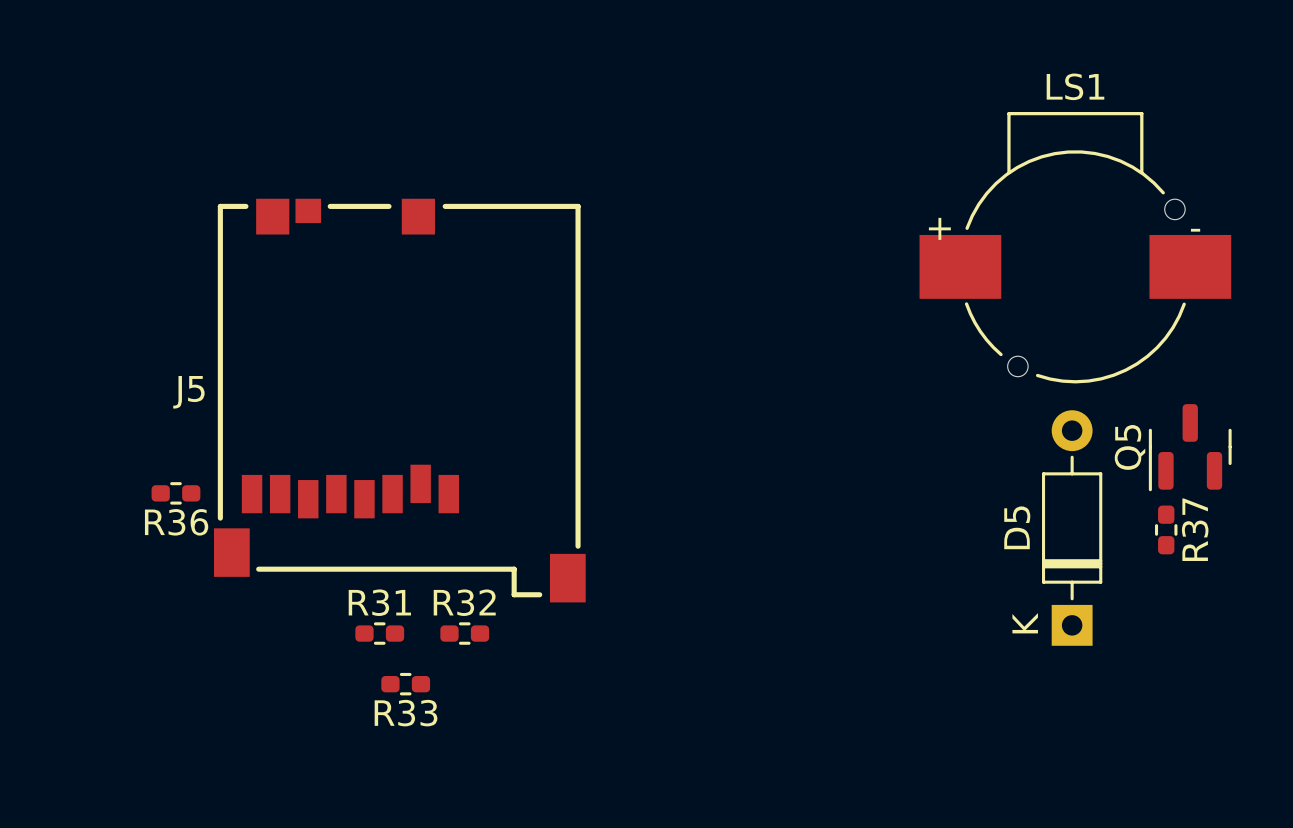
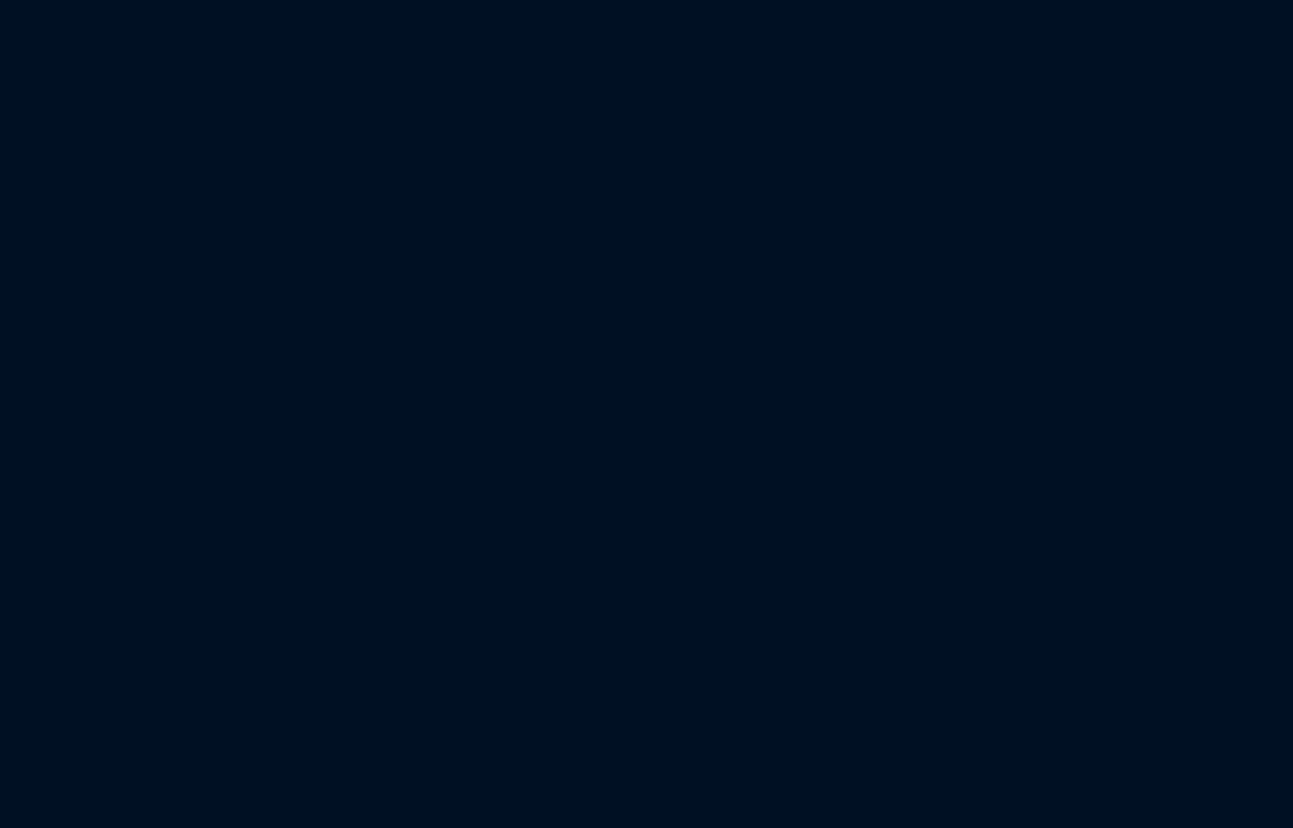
LS1: (1075, 247) -> none
J5: (399, 400) -> none
Q5: (1190, 447) -> none
R36: (175, 493) -> none
D5: (1072, 528) -> none
R37: (1166, 529) -> none
R31: (379, 633) -> none
R32: (464, 633) -> none
R33: (405, 684) -> none

